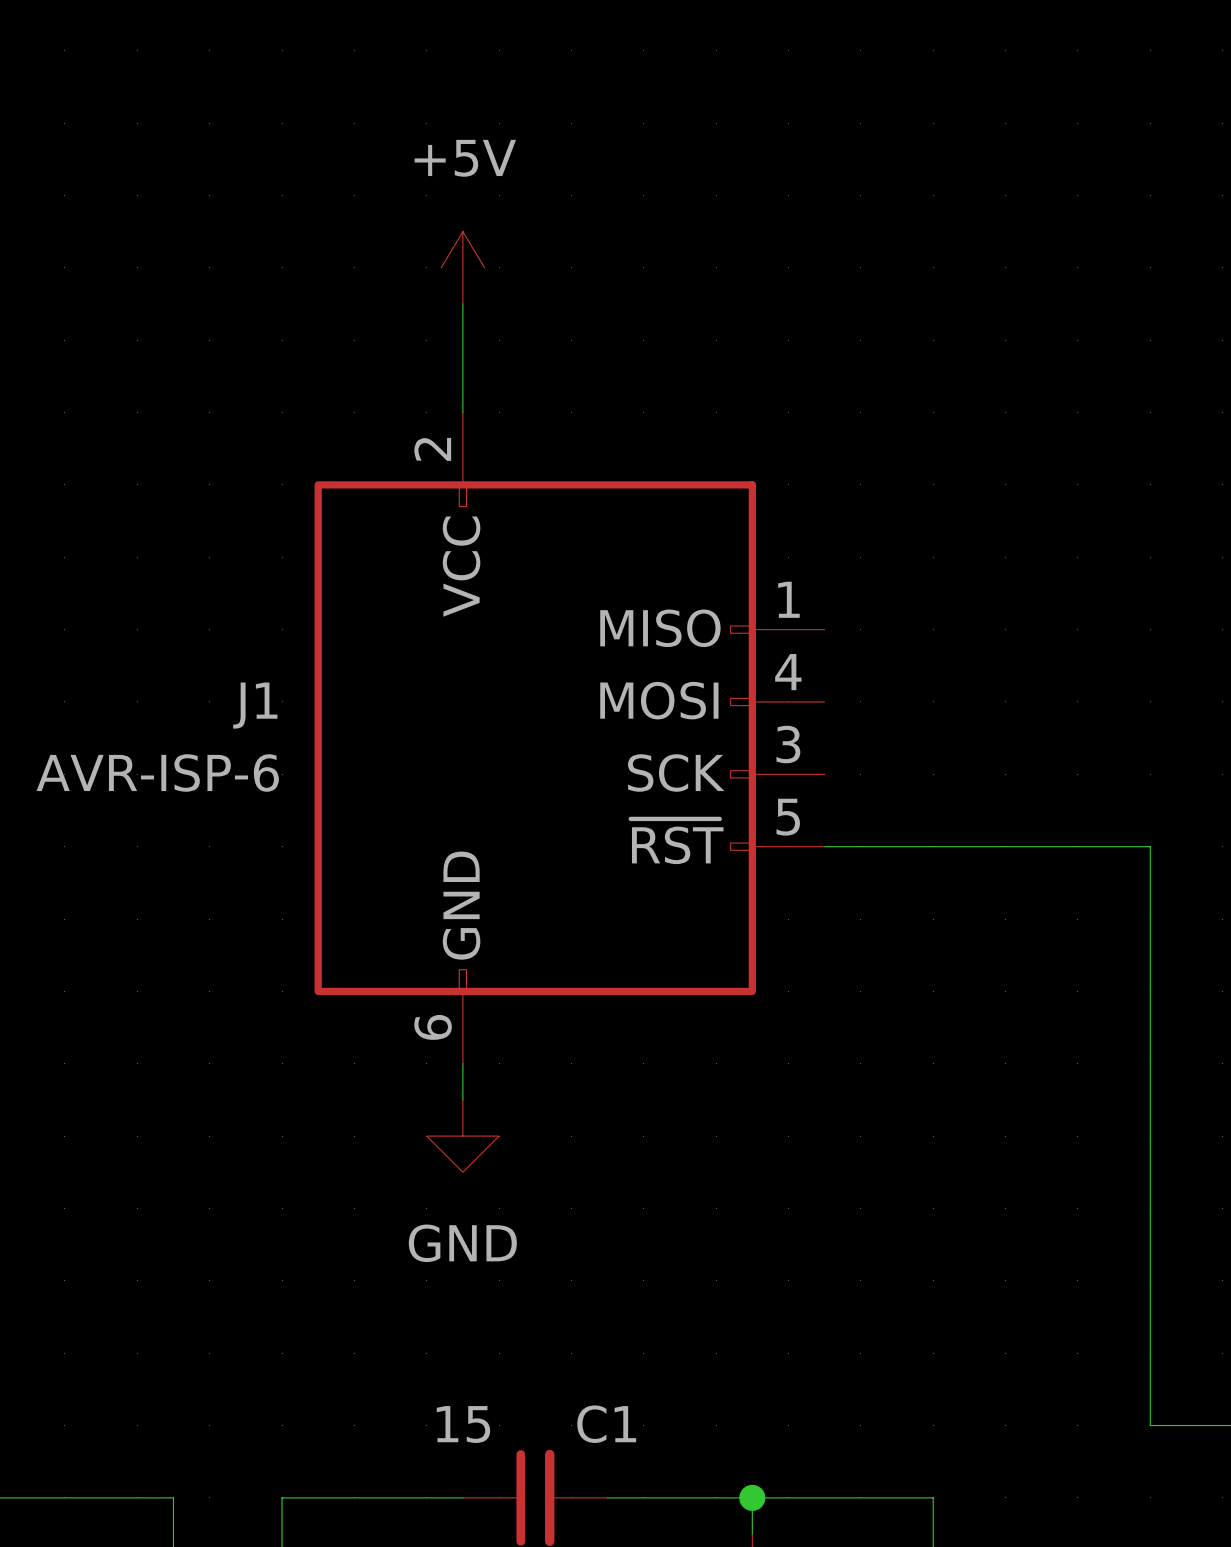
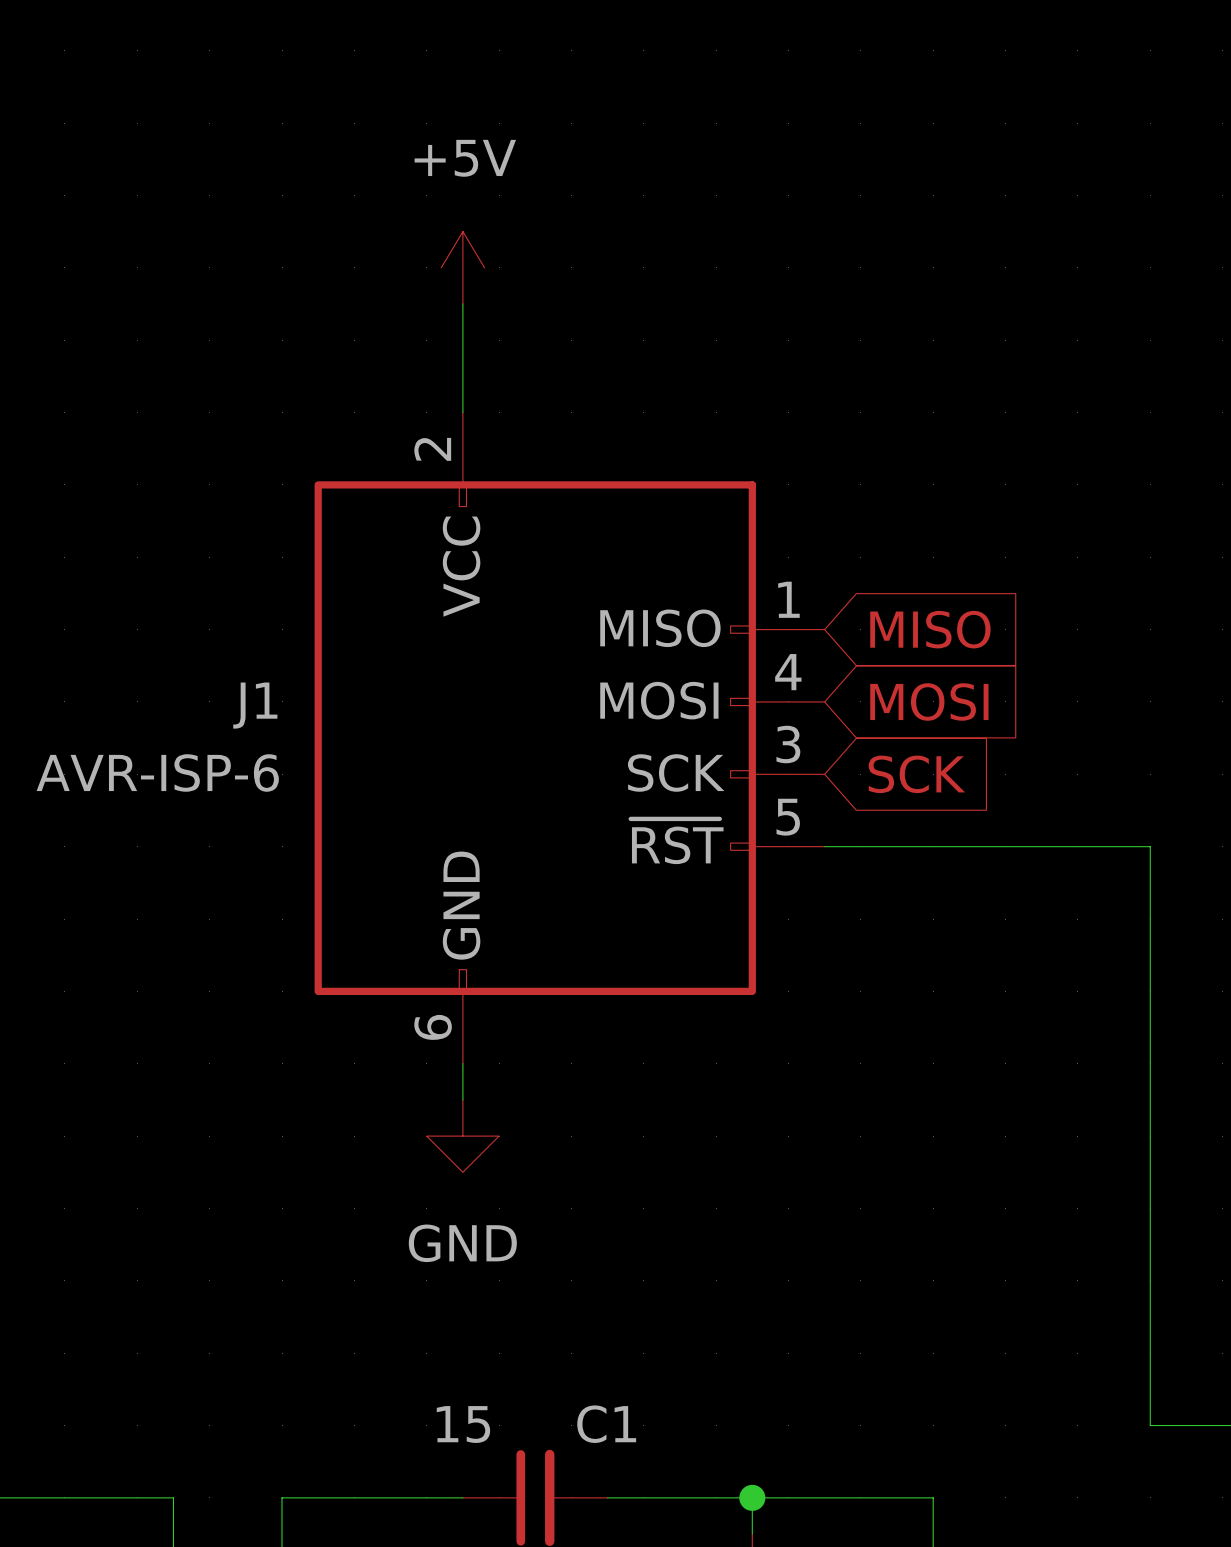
global label: none -> MISO (930, 629)
global label: none -> MOSI (929, 701)
global label: none -> SCK (916, 774)

